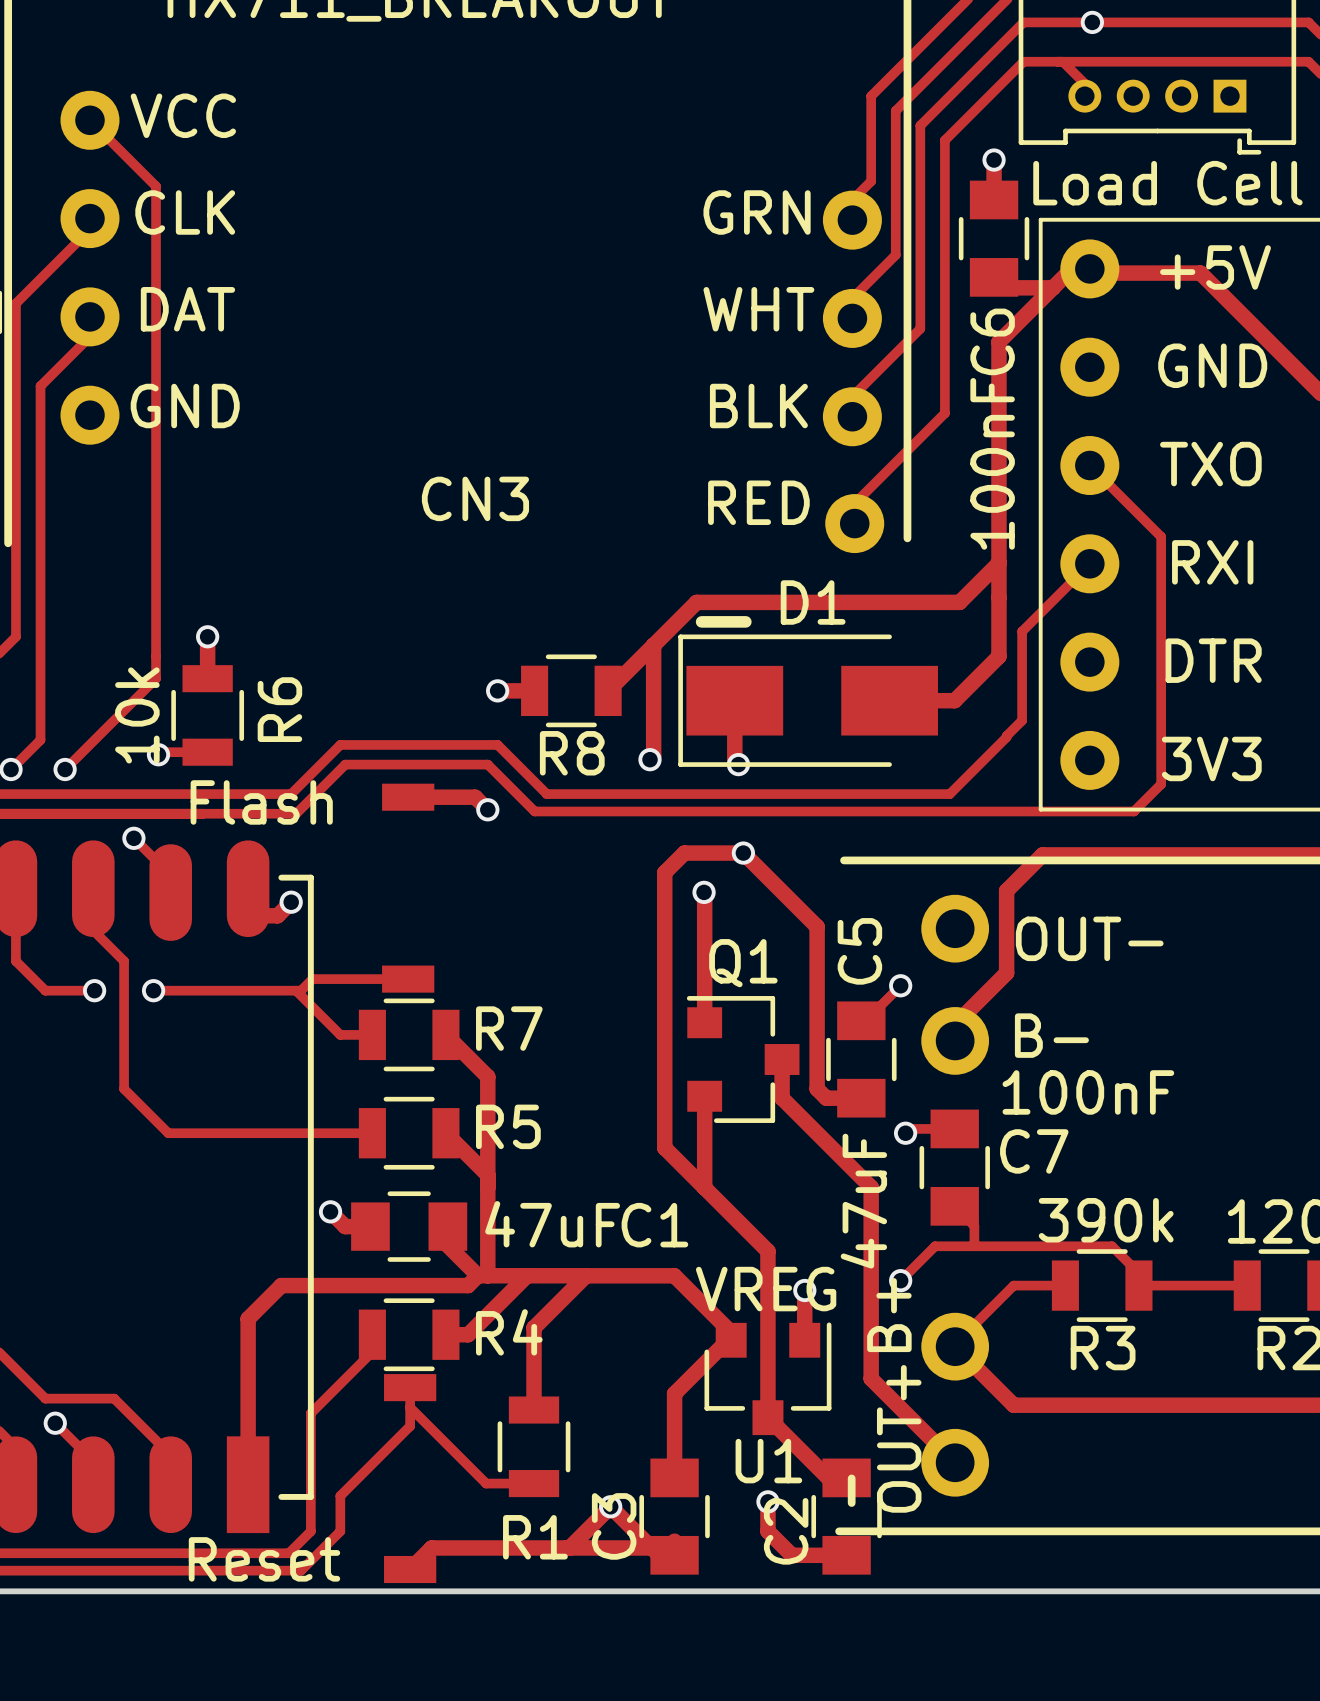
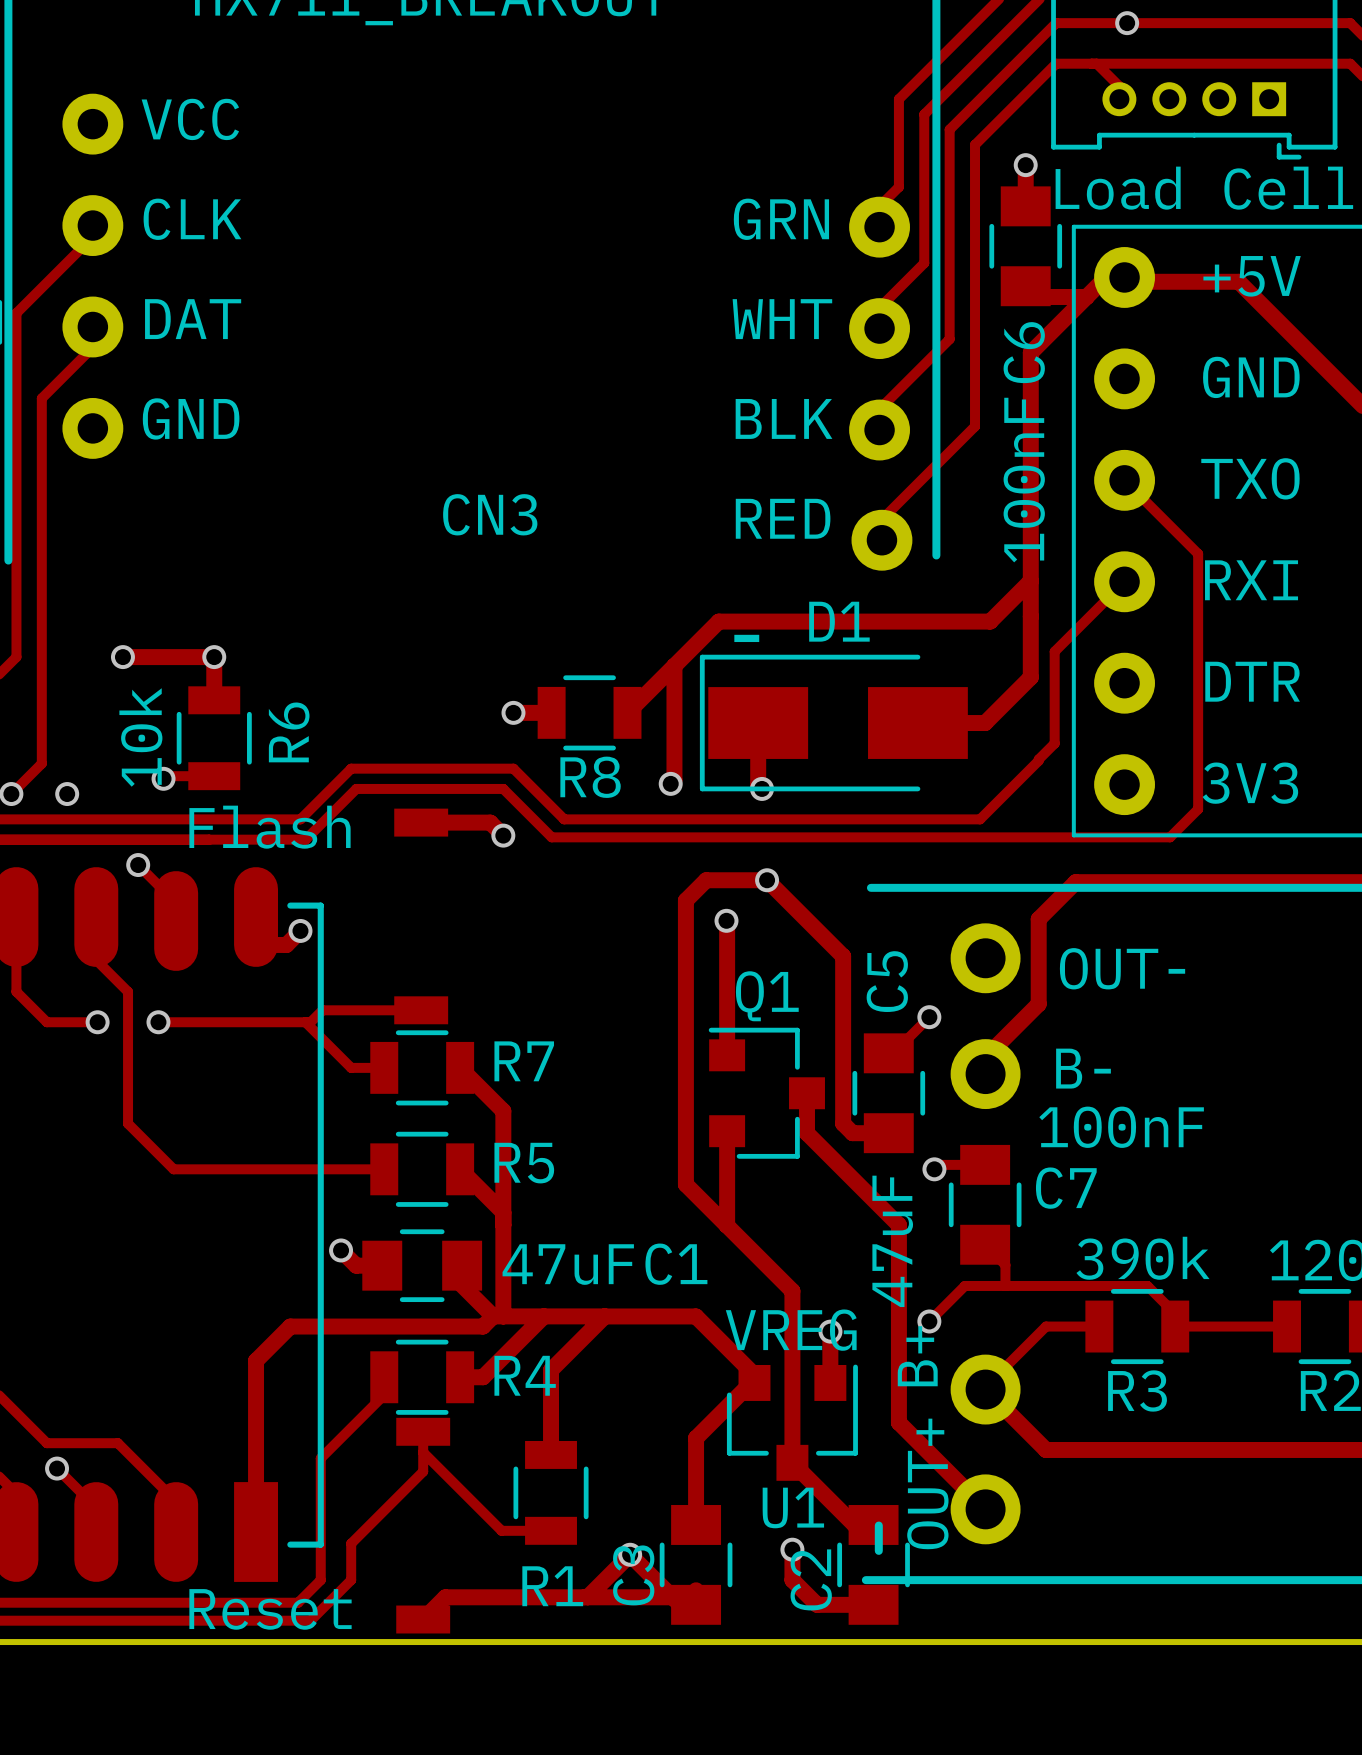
track: (89, 120) (156, 186) (156, 678) (65, 769) -> none
track: none -> (122, 657) (214, 657)
via: none -> (122, 657)

